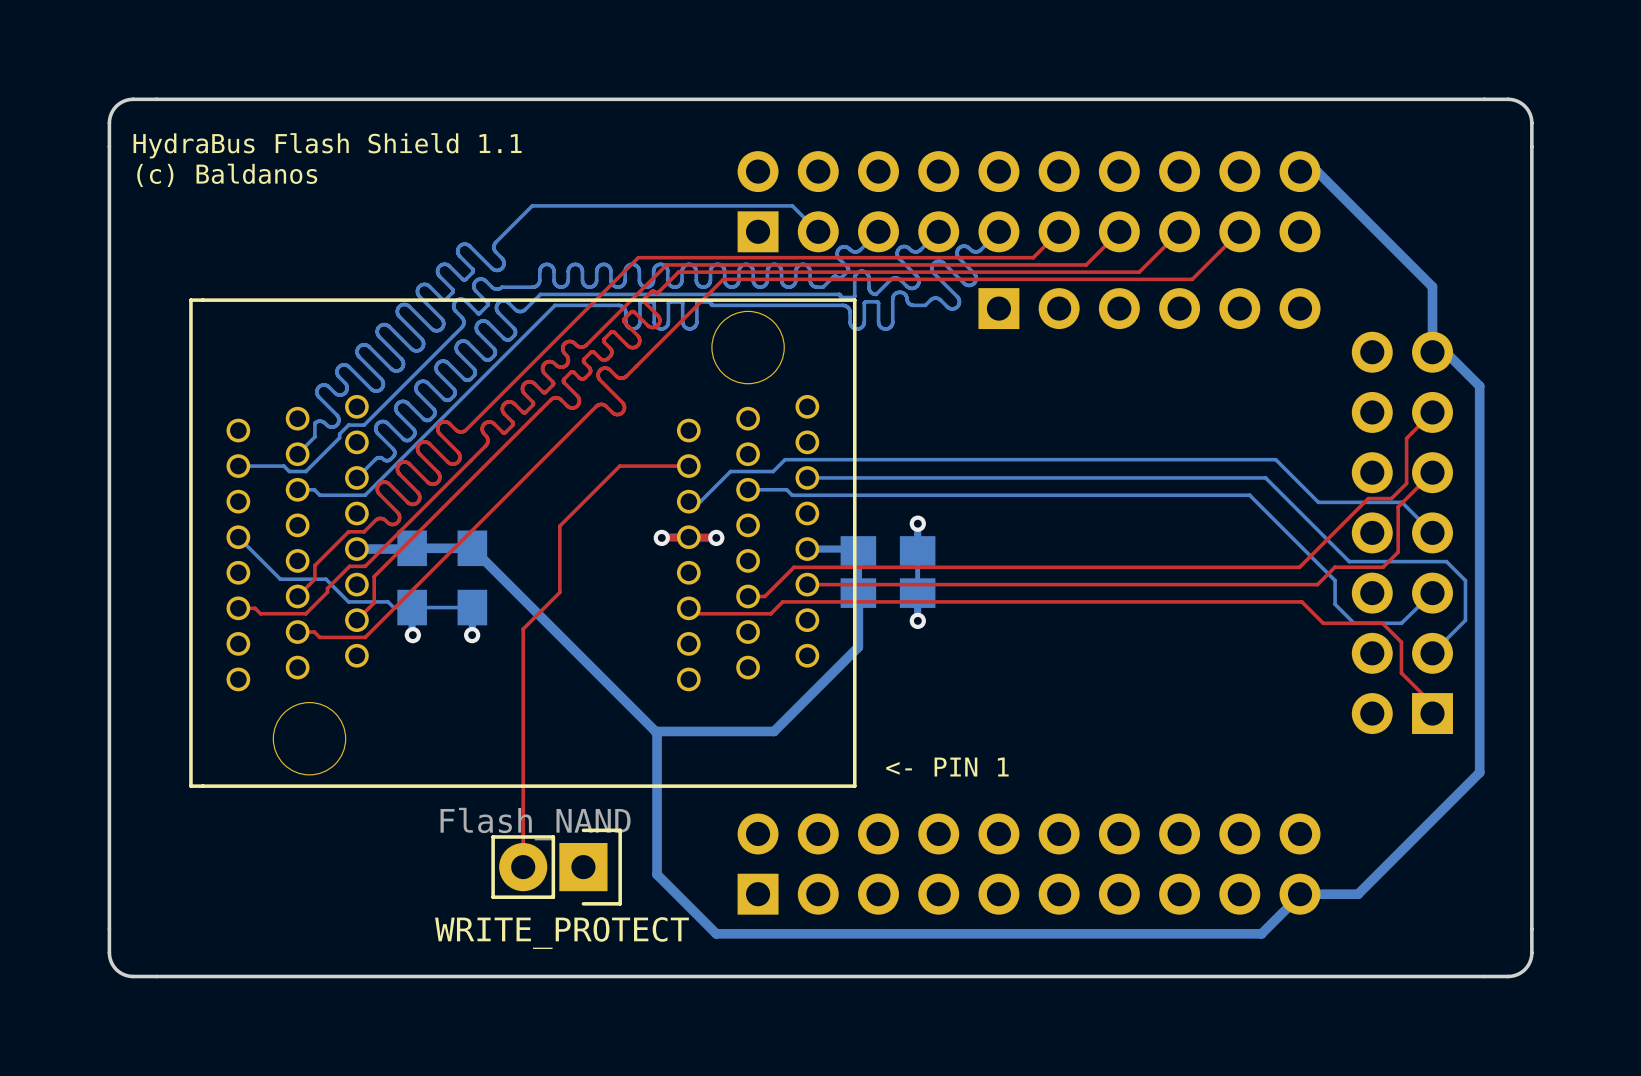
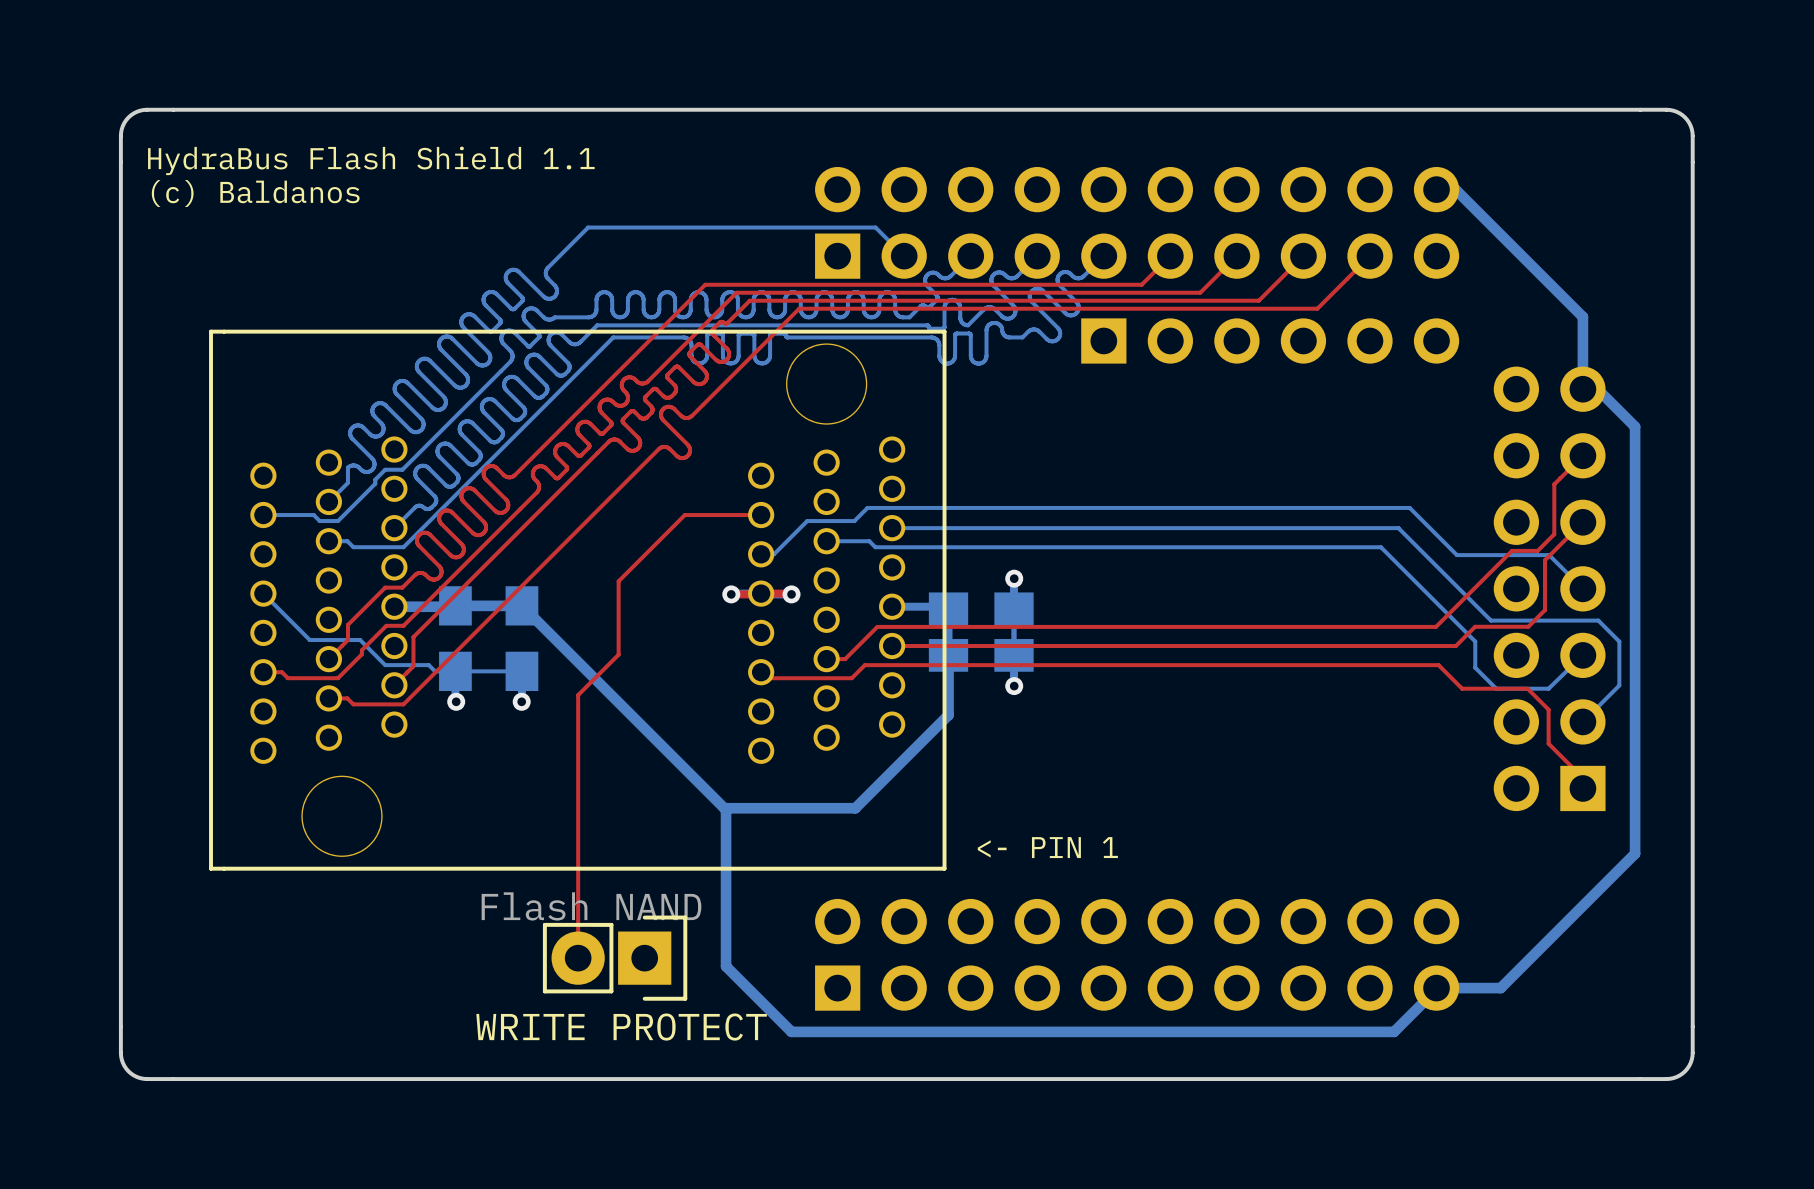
part value: WRITE_PROTECT (561, 933) -> WRITE PROTECT (621, 1027)

